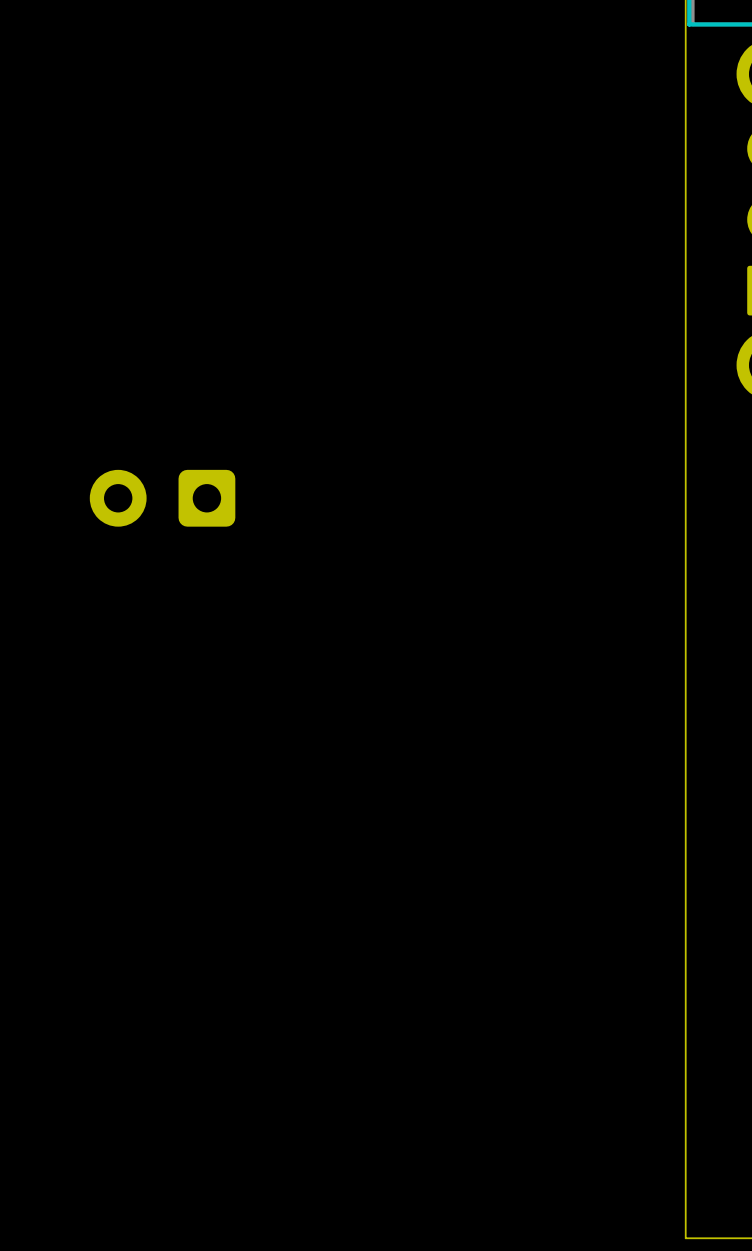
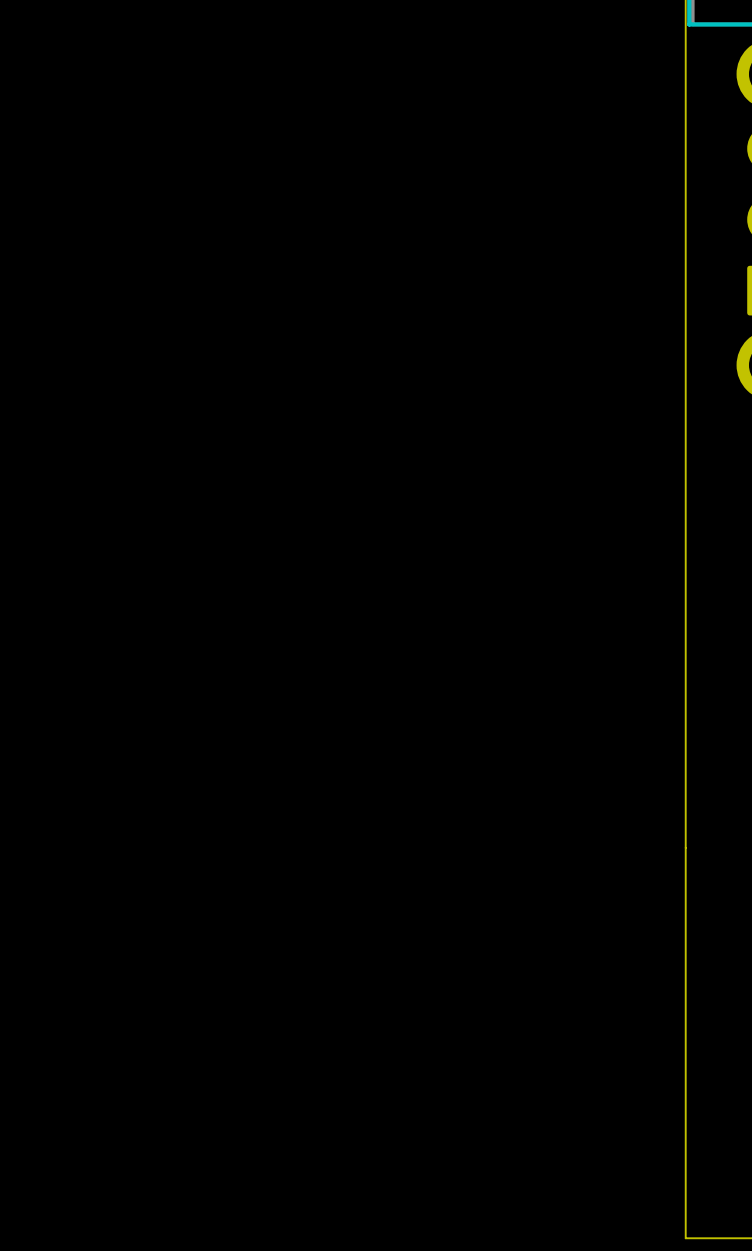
part: (162, 498) -> none

